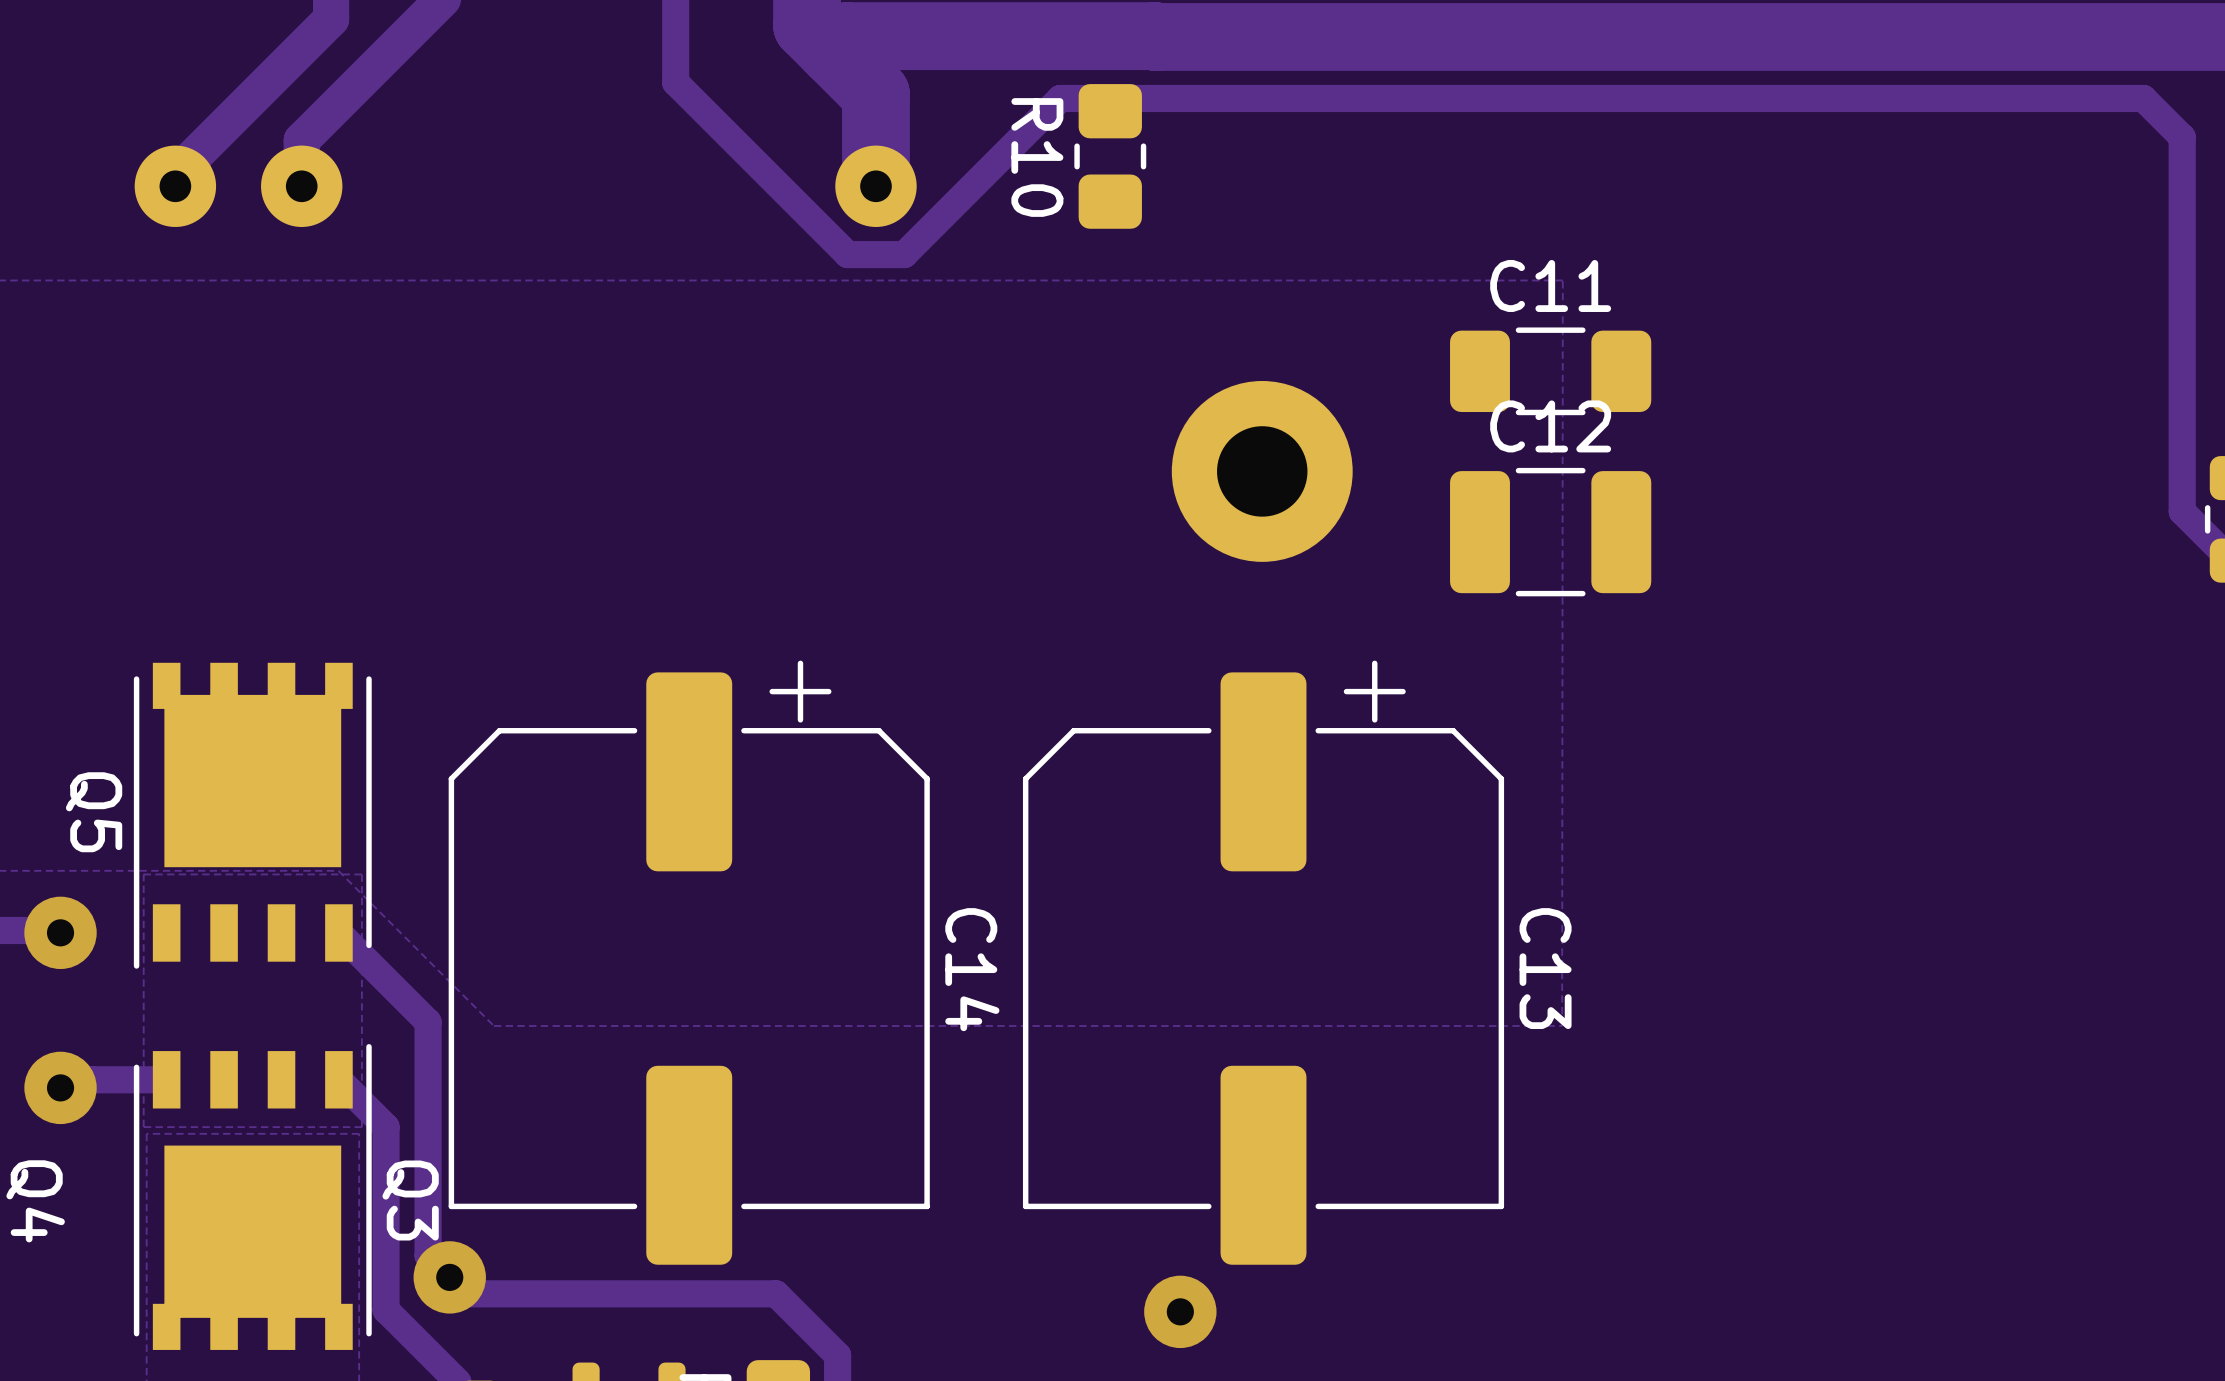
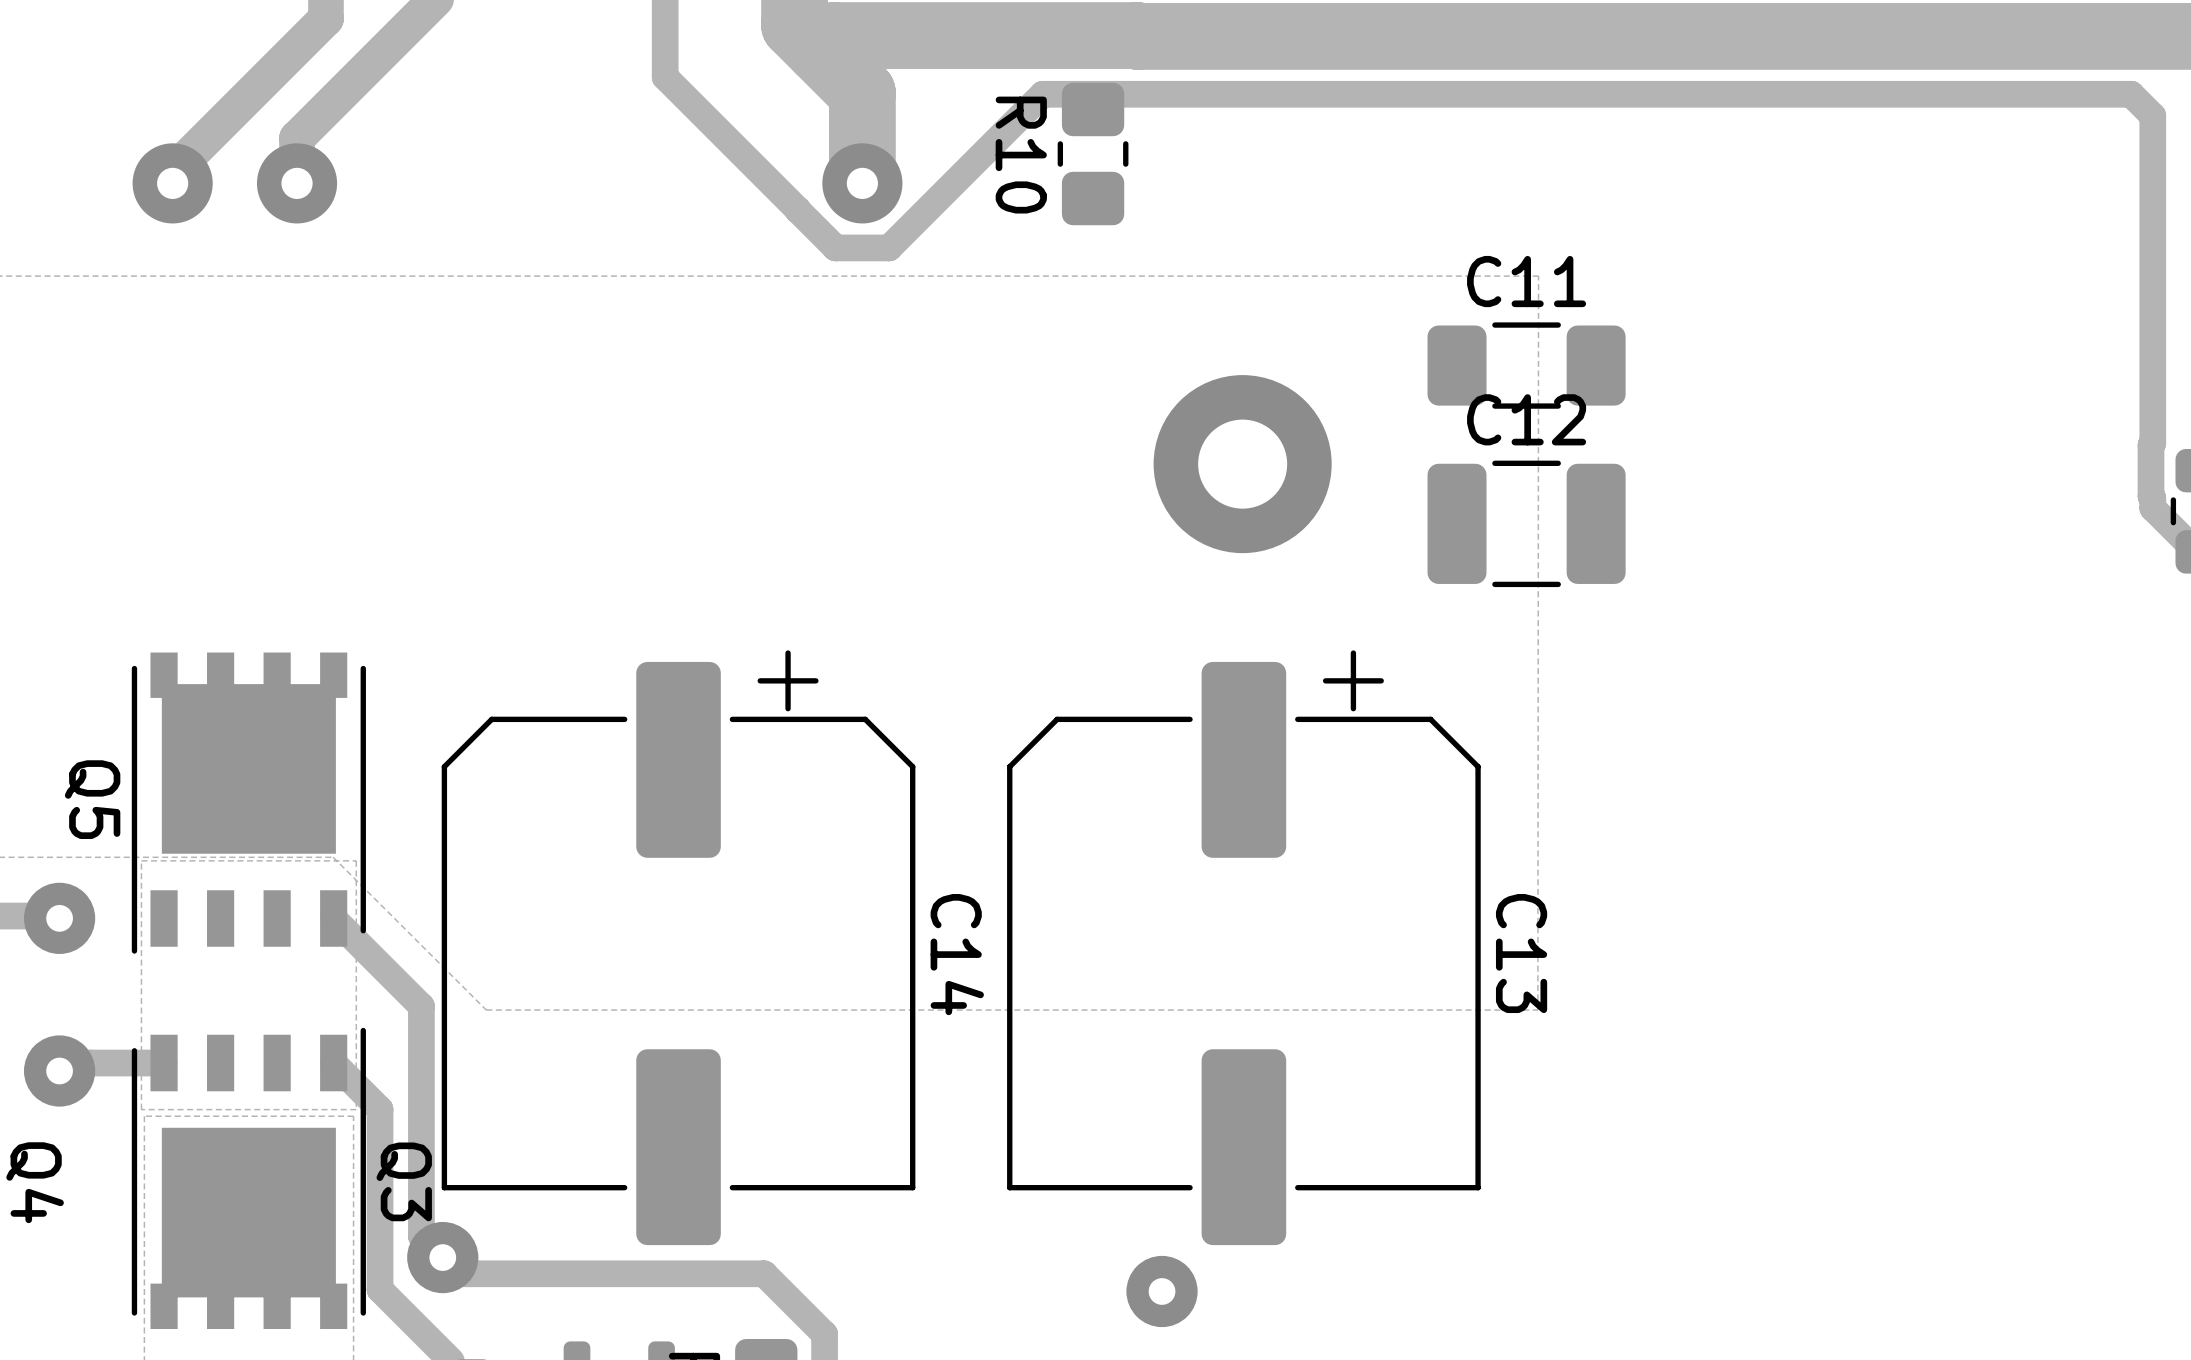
track: (675, 78) (675, 82) (847, 254) (904, 254) (1060, 98) (2143, 98) (2182, 137) (2182, 511) (2186, 516) -> (665, 77) (835, 247) (889, 247) (1042, 94) (2131, 94) (2152, 115) (2152, 443) (2151, 445) (2152, 508)

